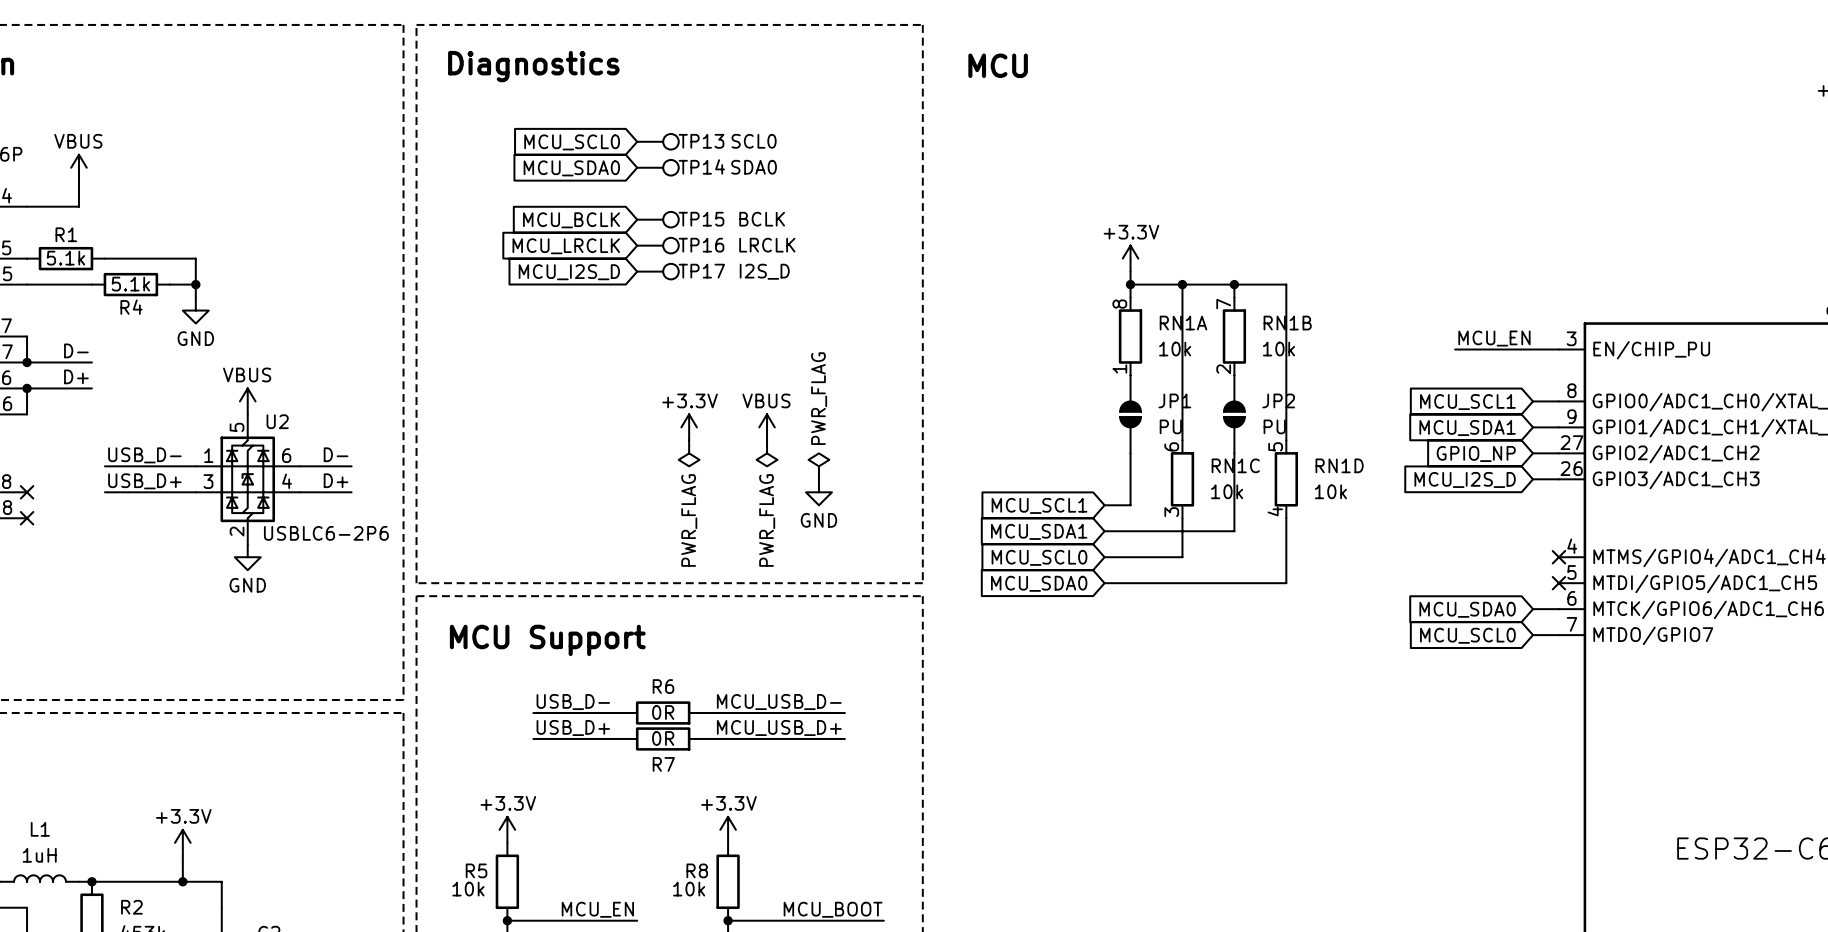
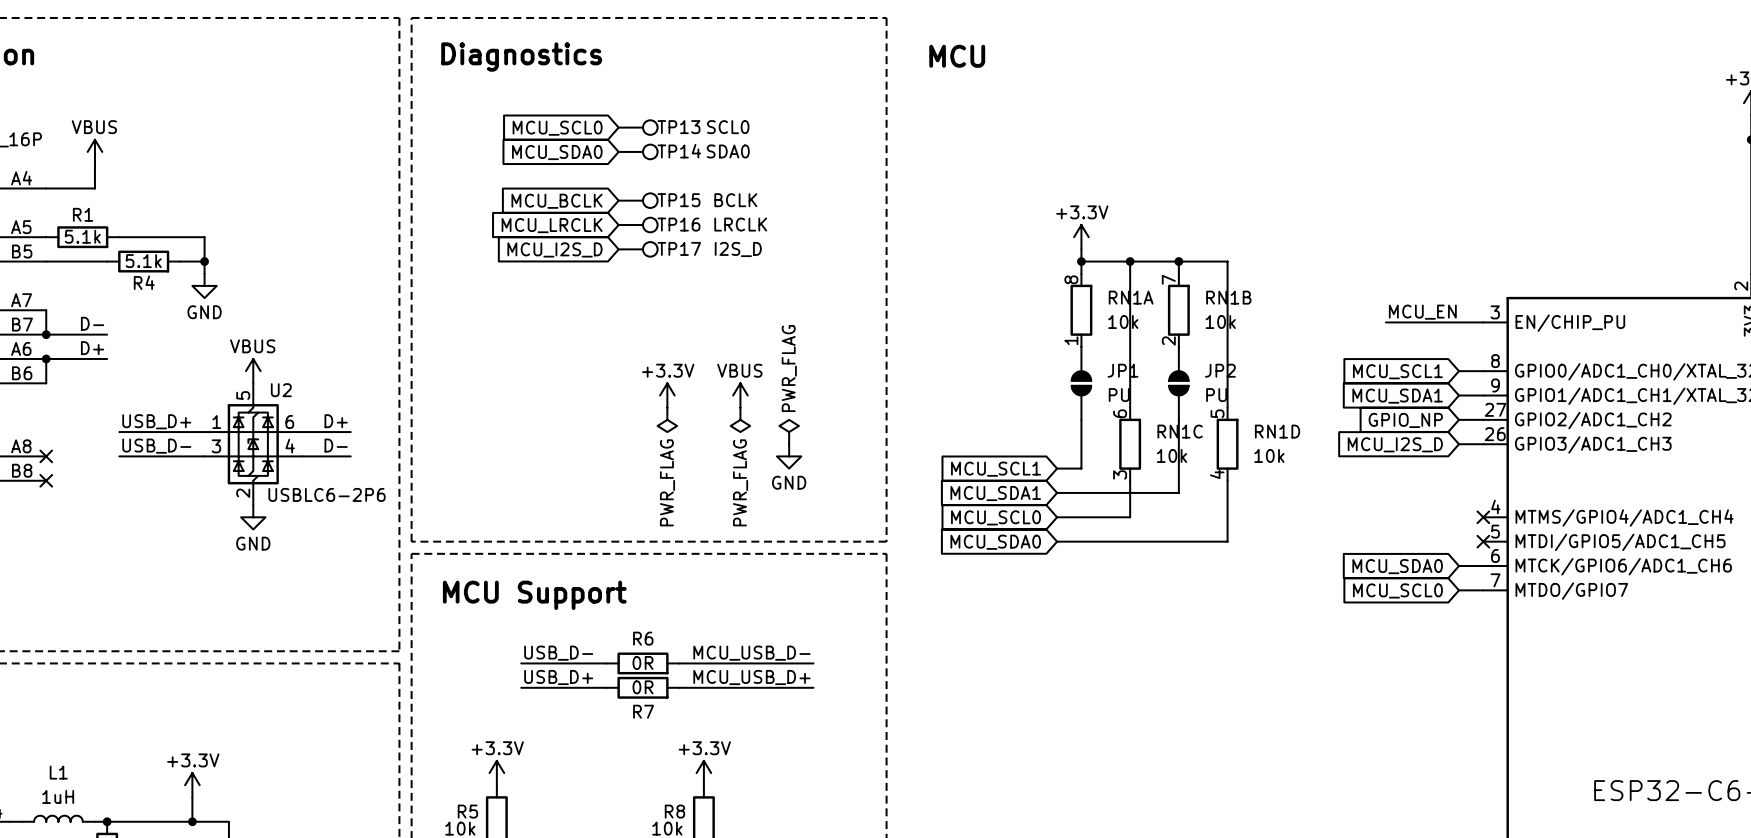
label: D- (336, 454) -> D+ (336, 421)
label: USB_D- (144, 455) -> USB_D+ (156, 421)
label: D+ (336, 480) -> D- (336, 445)
label: USB_D+ (144, 481) -> USB_D- (156, 446)

